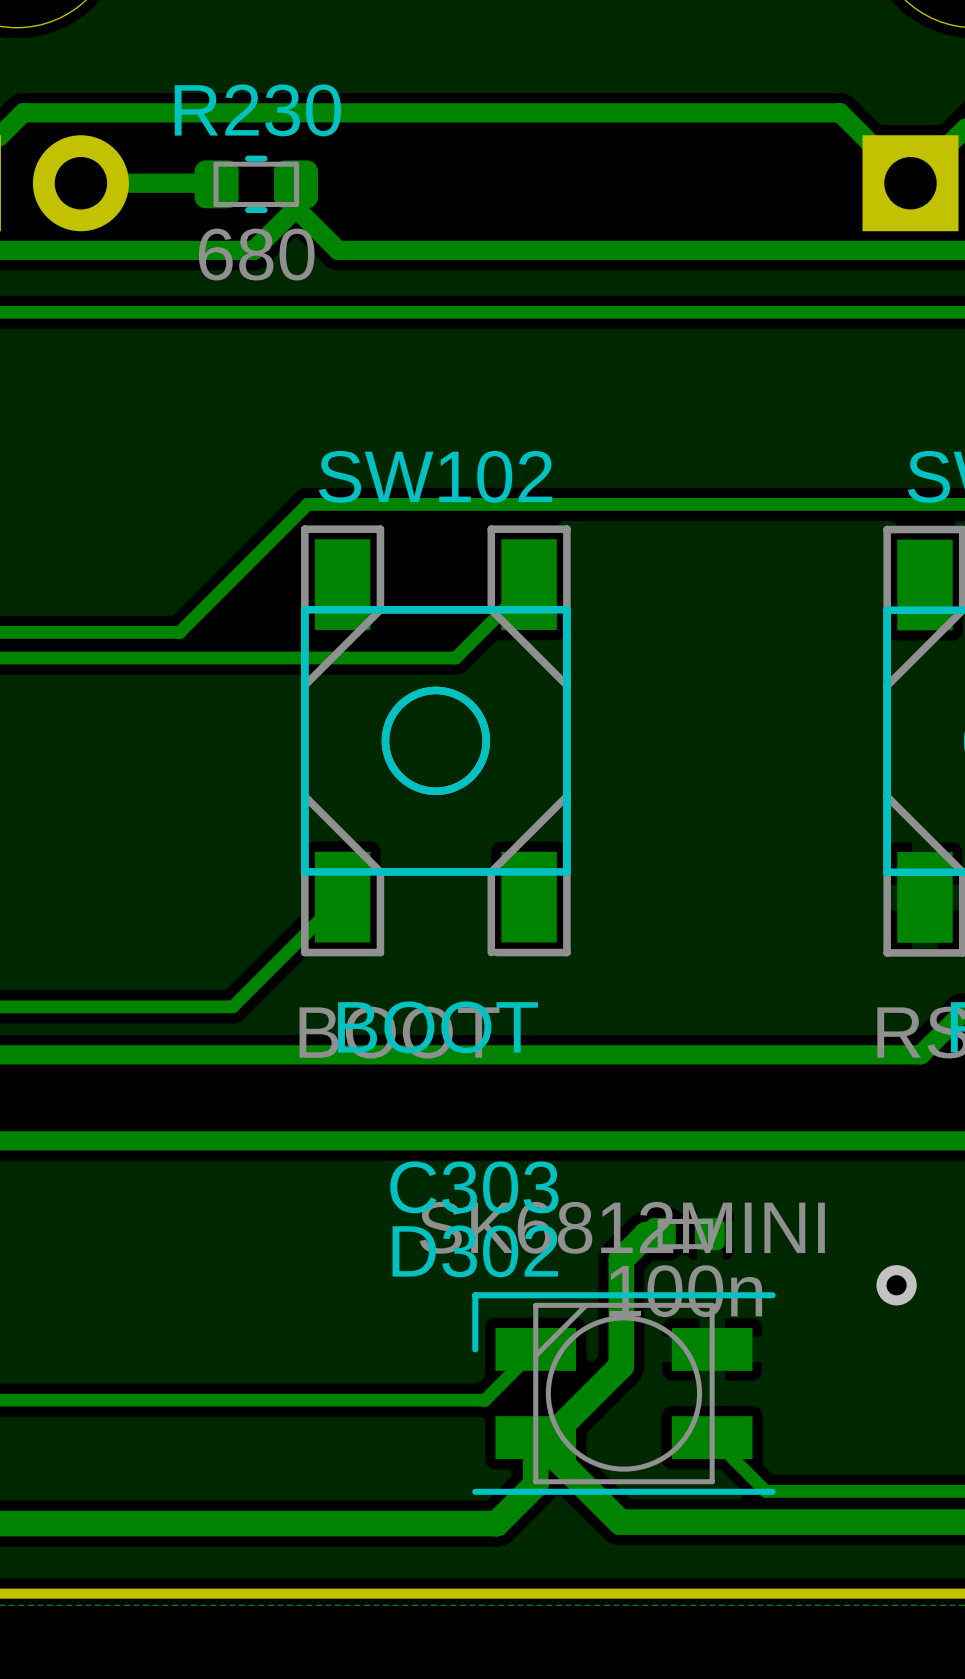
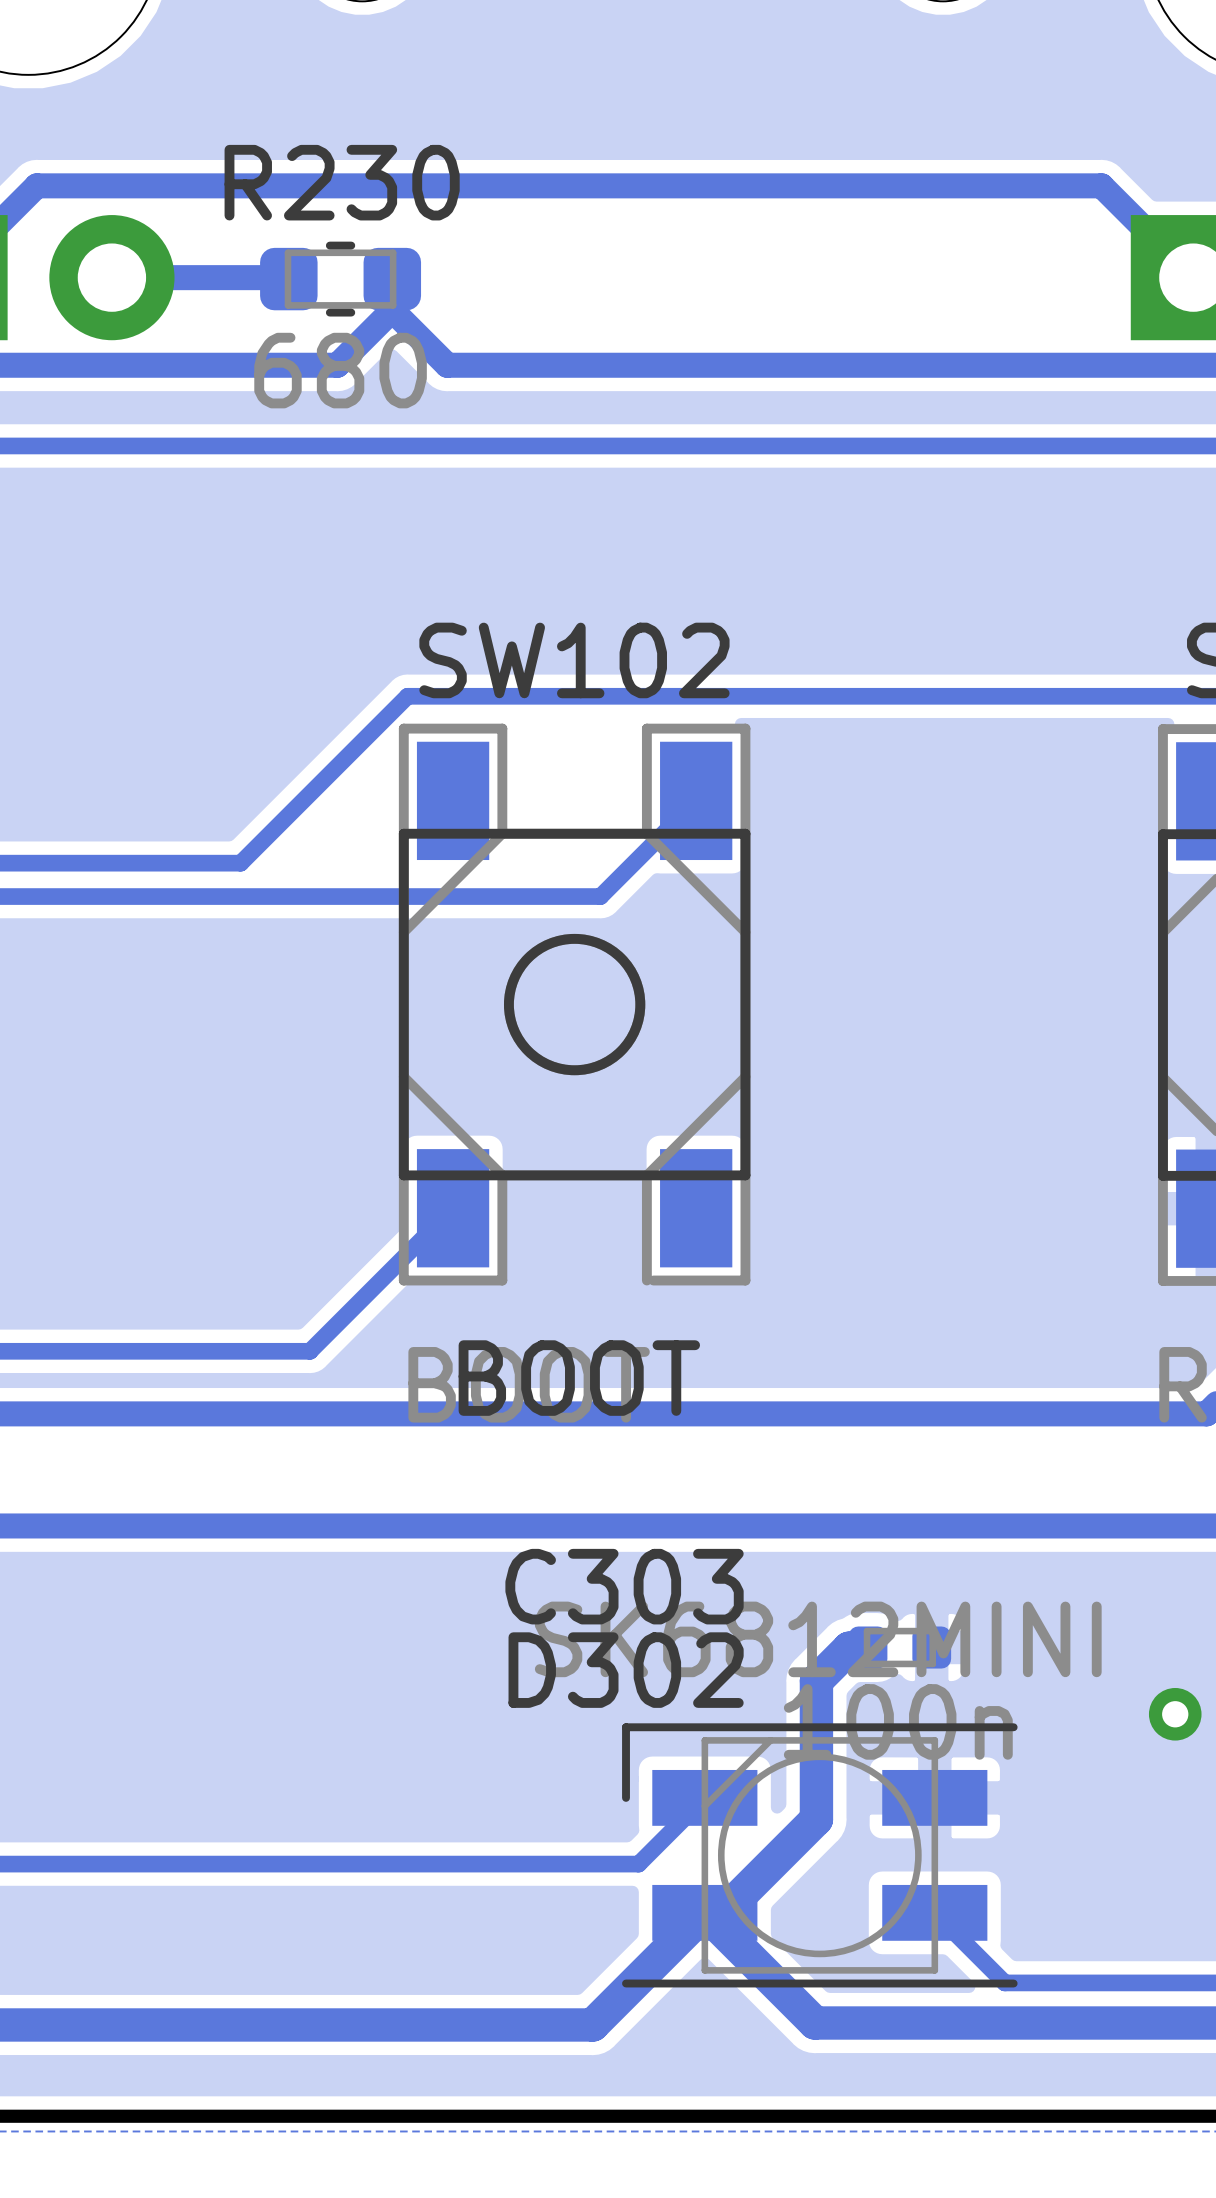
track: (535, 1437) (535, 1484) (496, 1523) (449, 1523) -> (704, 1912) (592, 2024)

